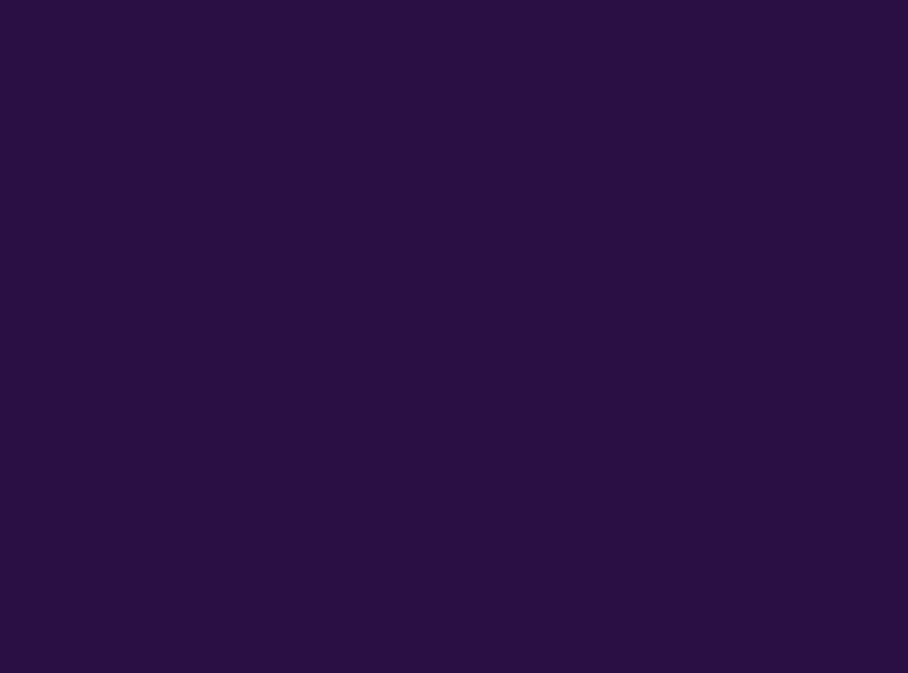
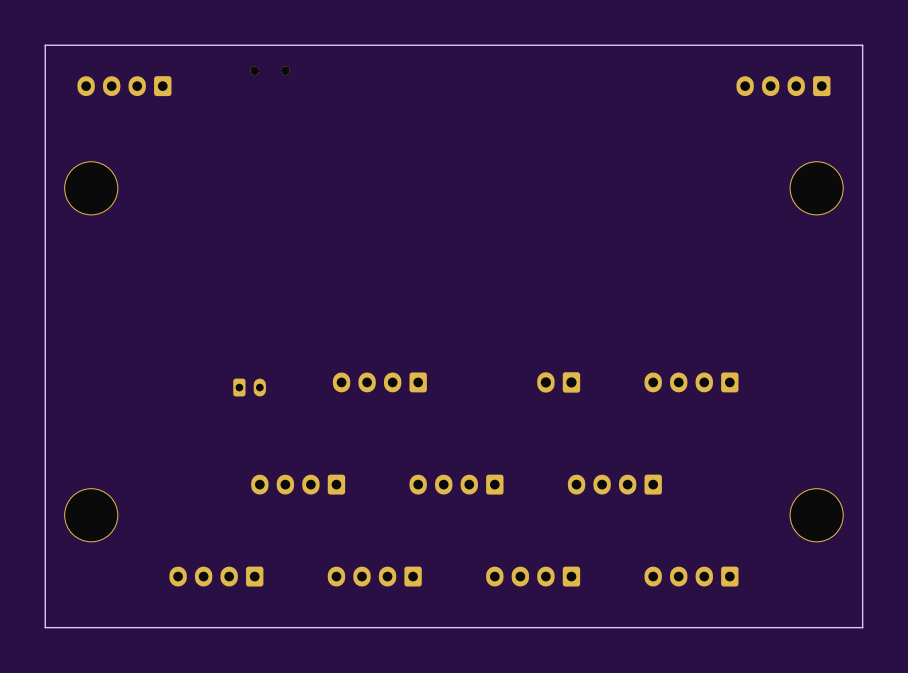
board edge: none -> (862, 45) (45, 45) (45, 627) (862, 627) (862, 45)
part: none -> (270, 70)
part: none -> (124, 86)
part: none -> (783, 86)
part: none -> (91, 188)
part: none -> (816, 188)
part: none -> (379, 382)
part: none -> (558, 382)
part: none -> (691, 382)
part: none -> (249, 387)
part: none -> (298, 484)
part: none -> (456, 484)
part: none -> (614, 484)
part: none -> (91, 515)
part: none -> (816, 515)
part: none -> (216, 576)
part: none -> (374, 576)
part: none -> (533, 576)
part: none -> (691, 576)

